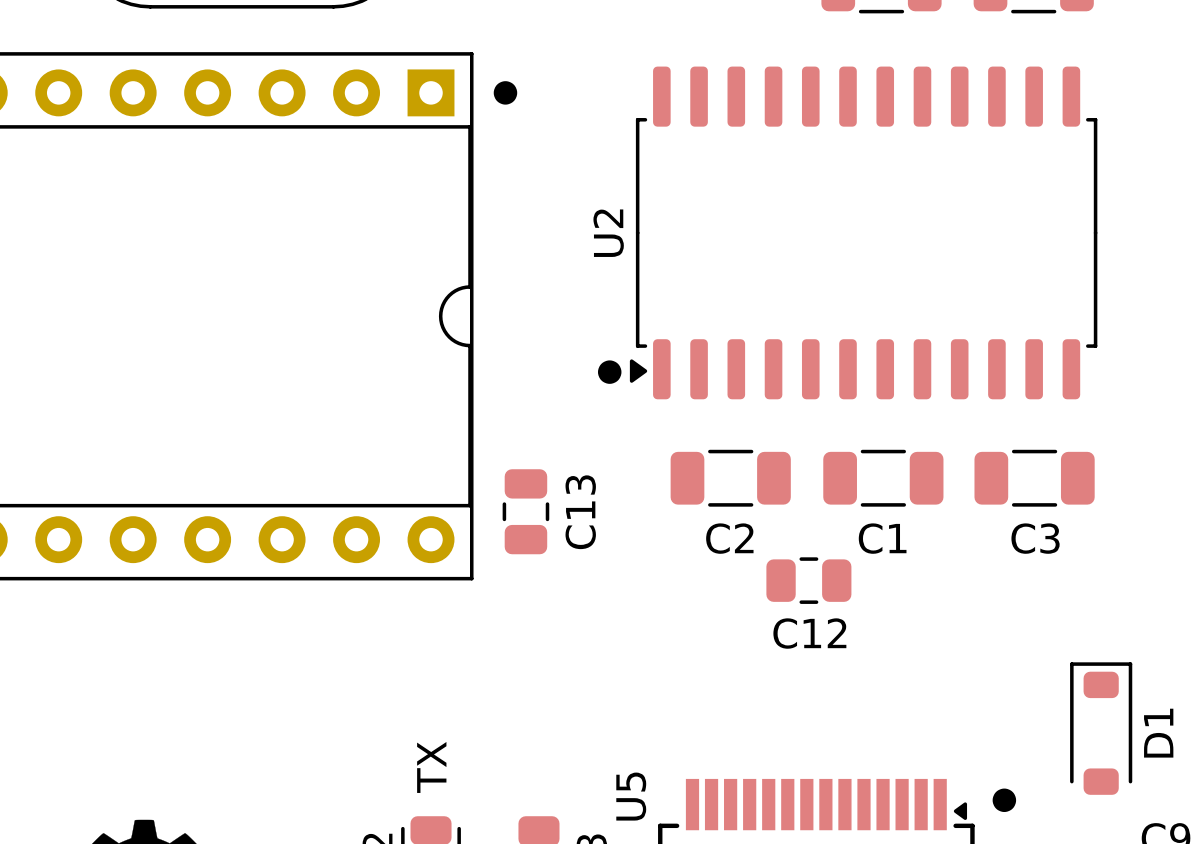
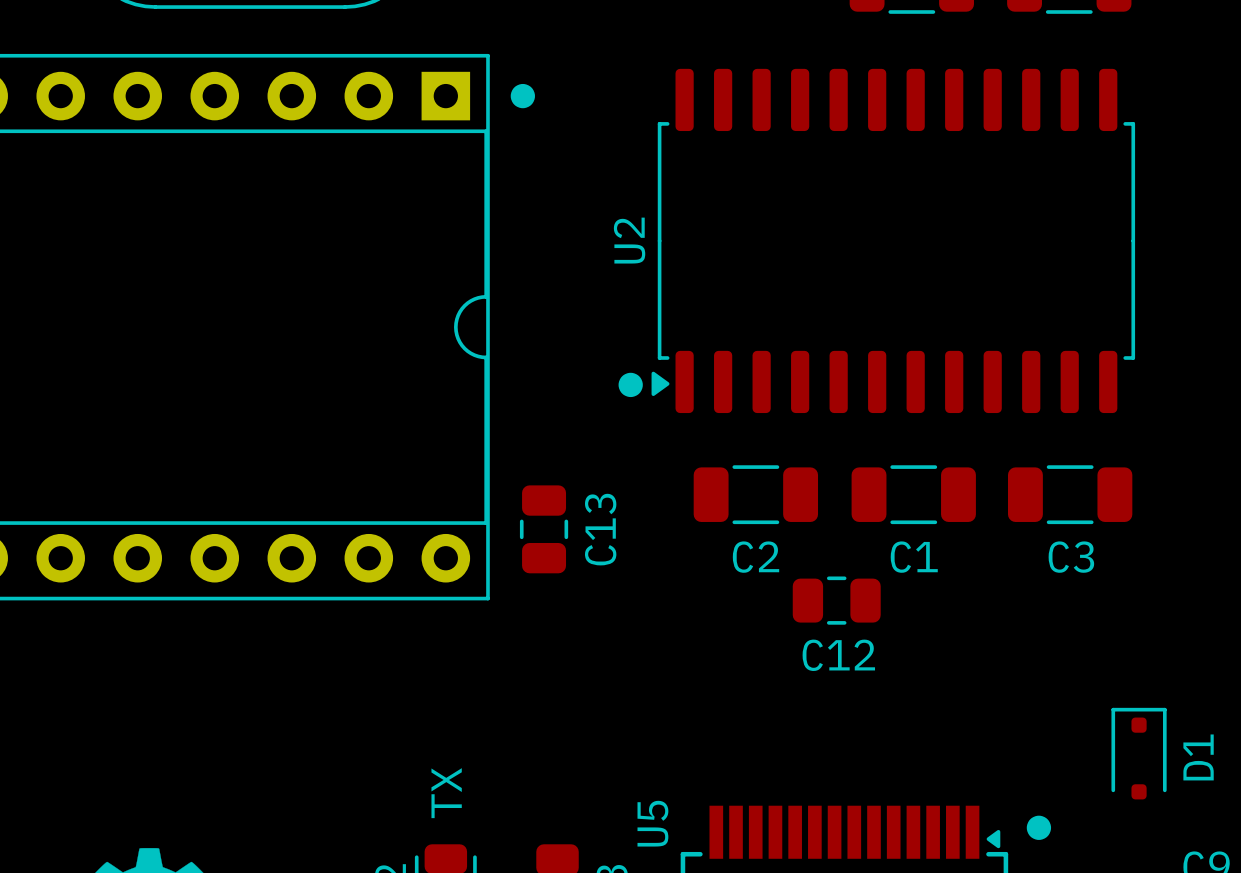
D1 footprint: [1070, 662, 1133, 795] -> [1111, 707, 1167, 800]

